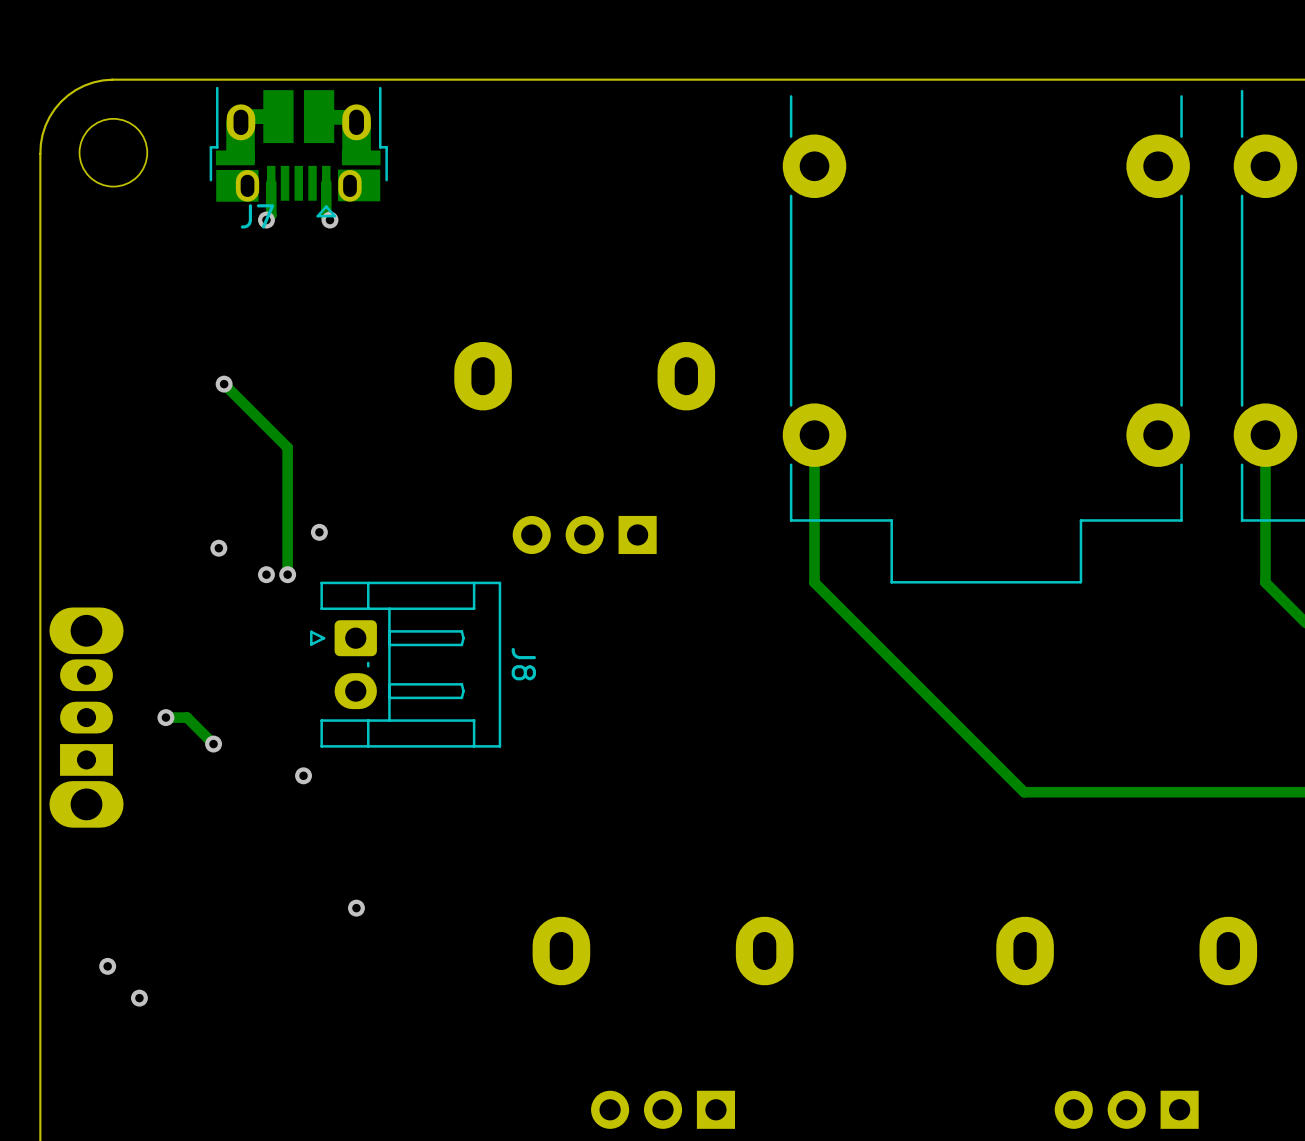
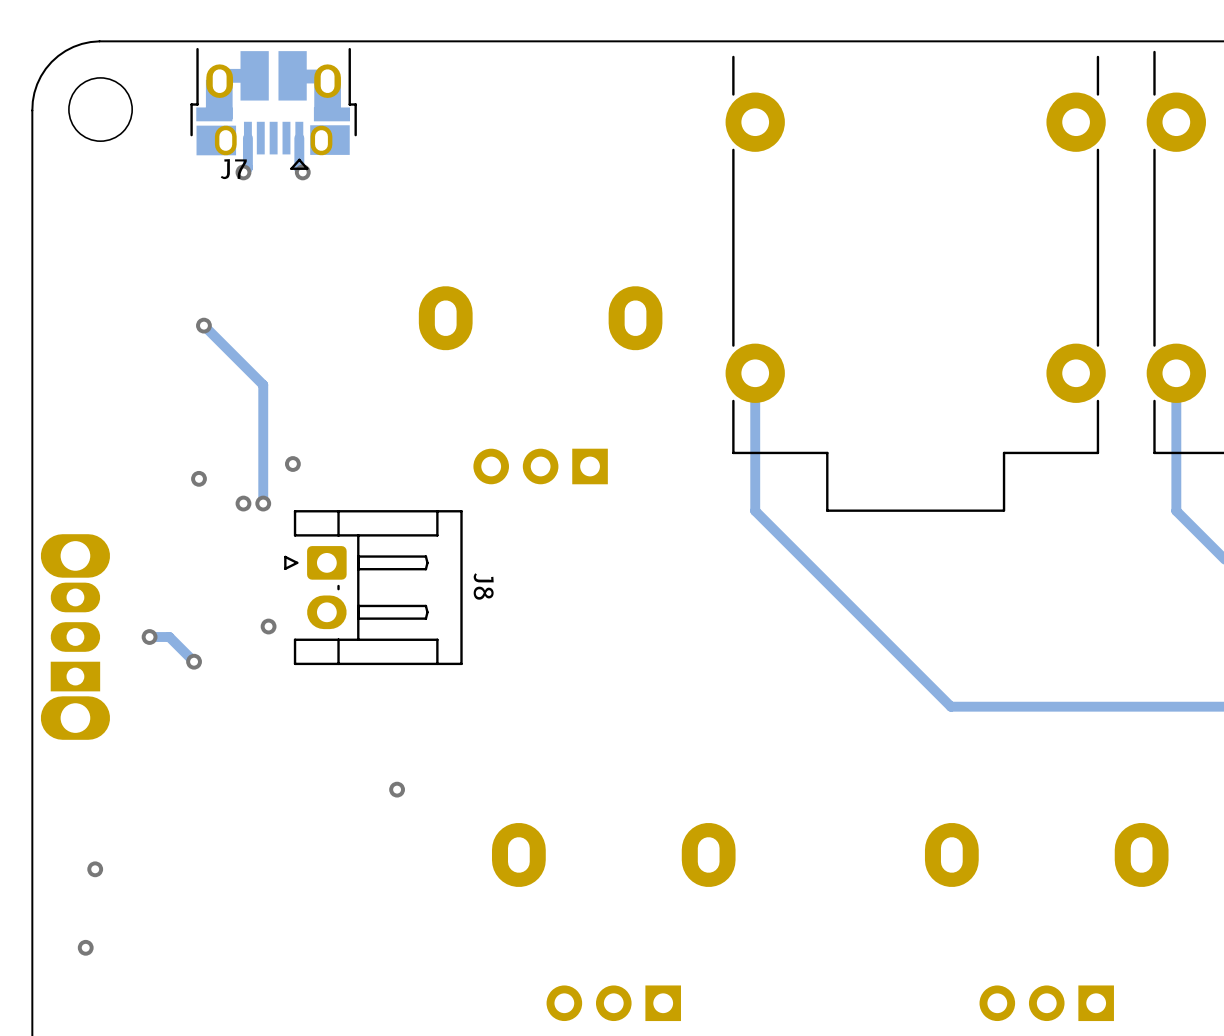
via position: (303, 775) -> (268, 626)
via position: (356, 908) -> (397, 789)
via position: (139, 998) -> (85, 947)

